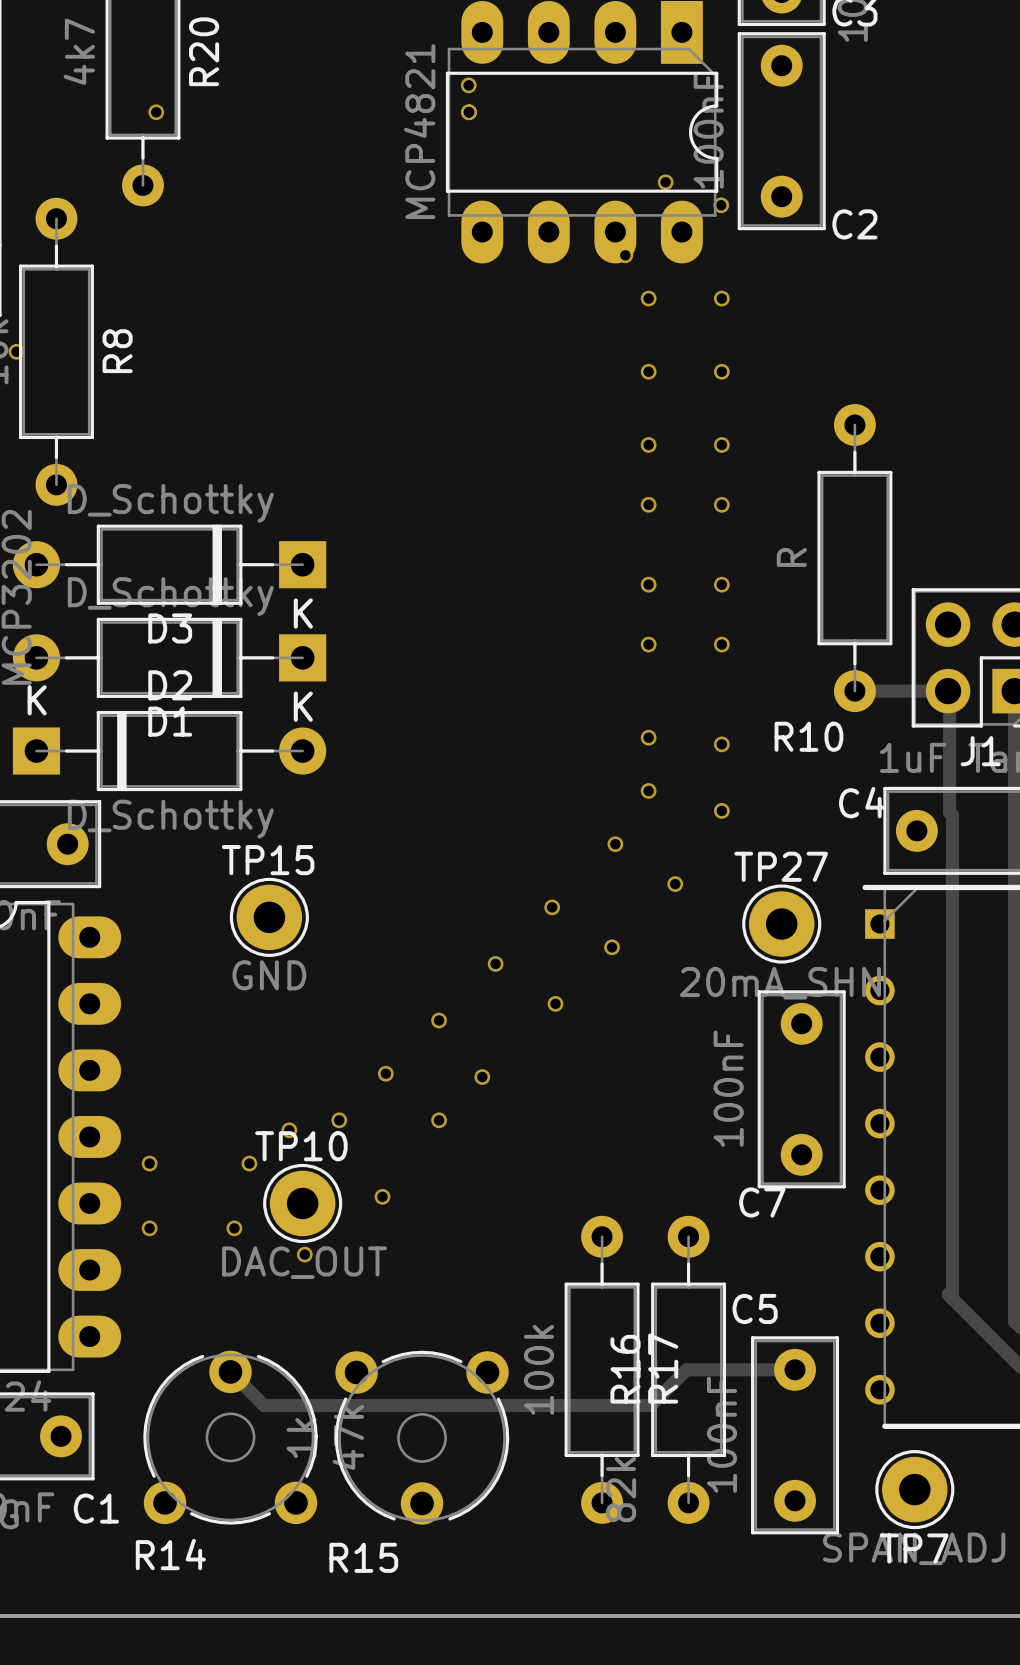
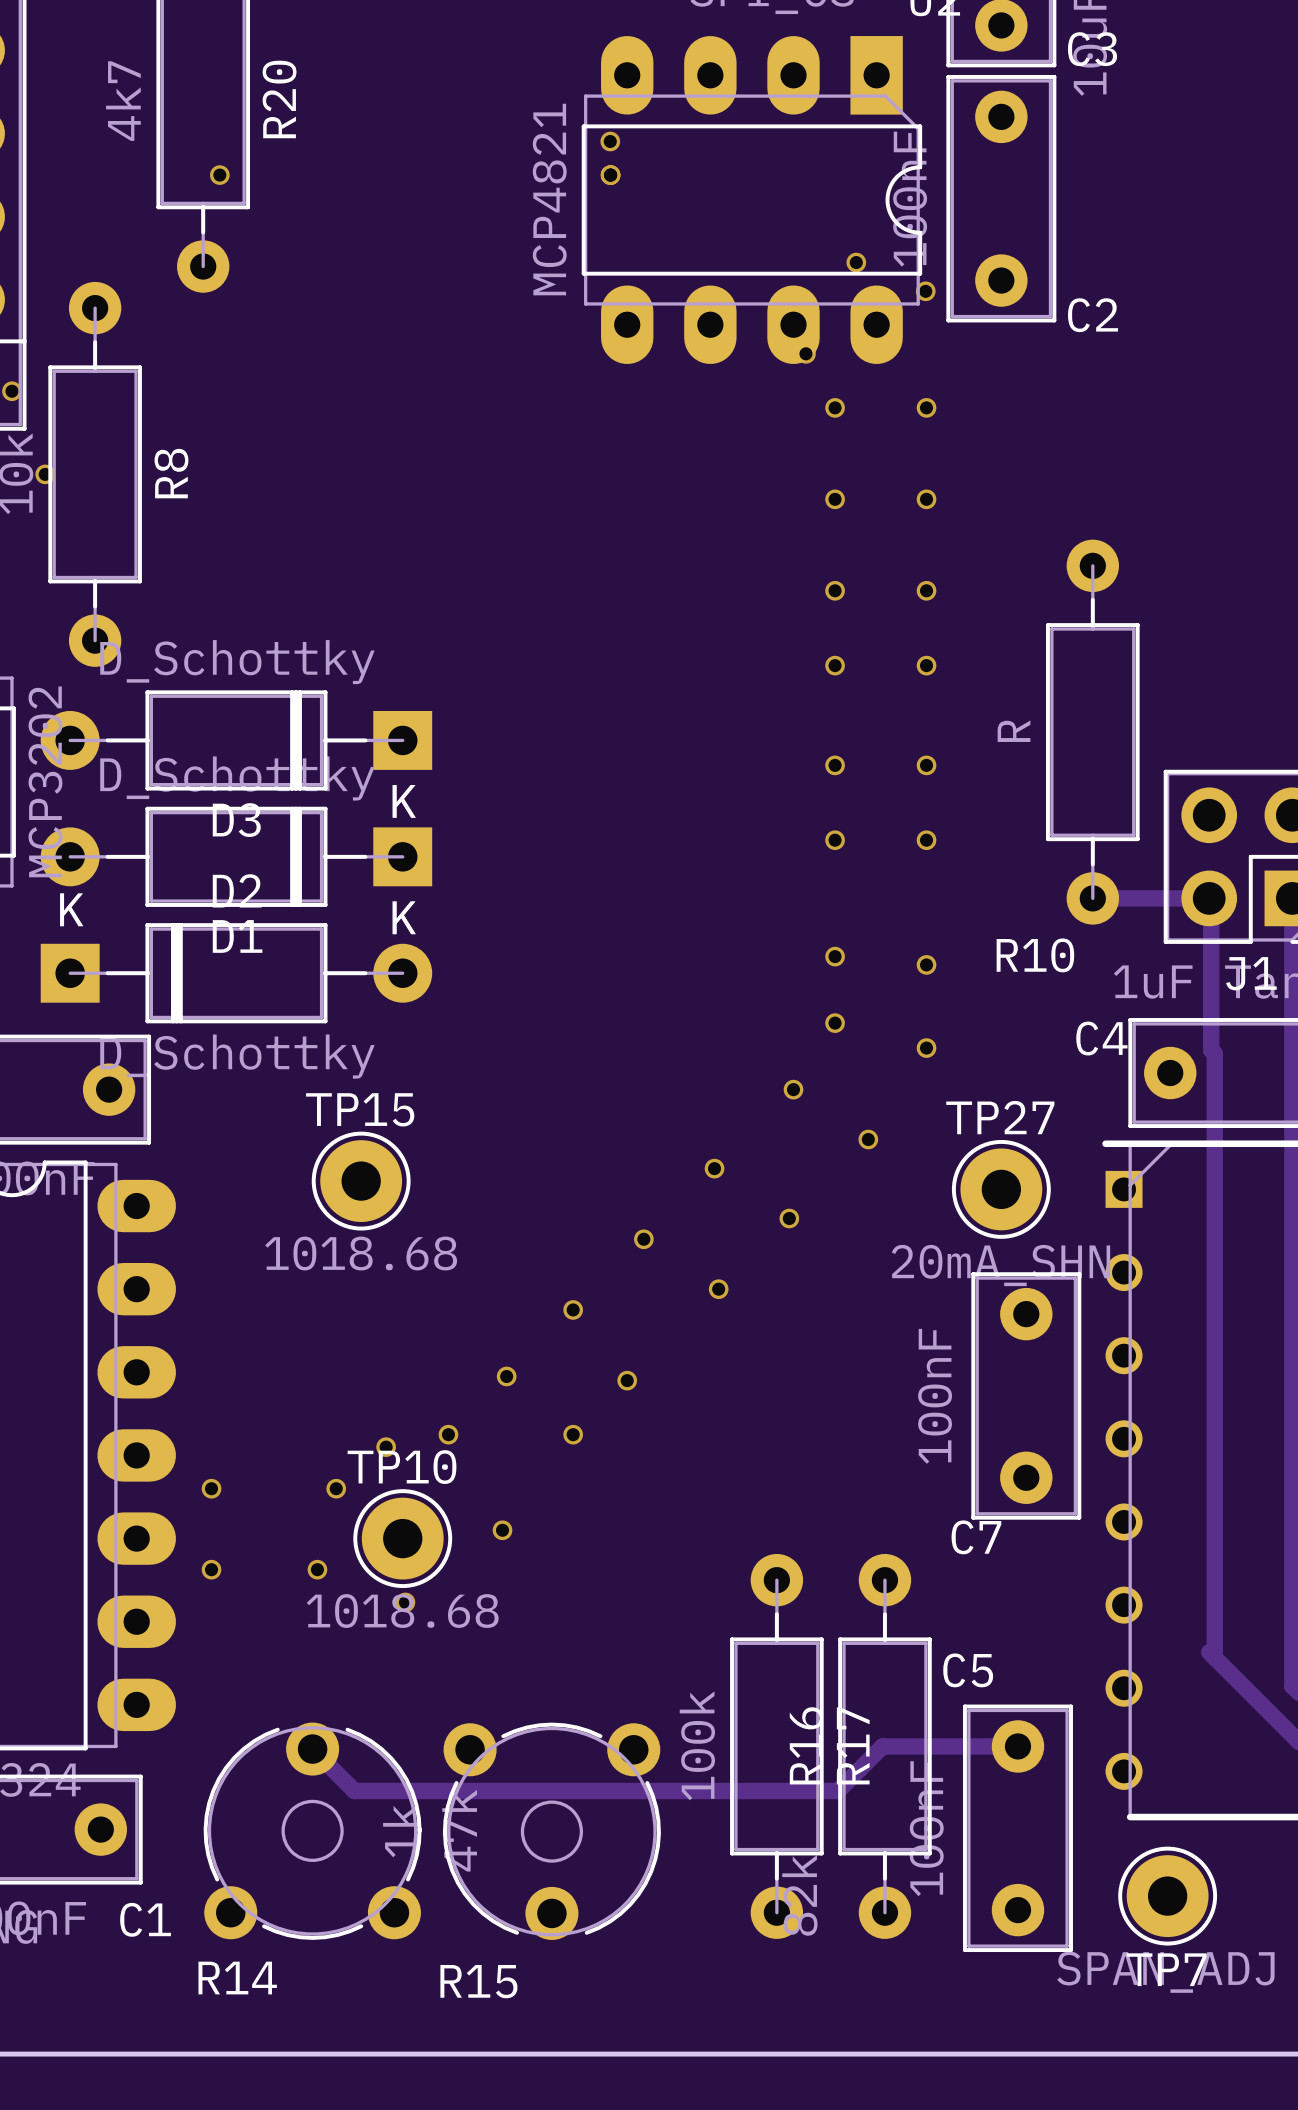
TP15 value: GND (269, 975) -> 1018.68 (361, 1253)
TP10 value: DAC_OUT (304, 1262) -> 1018.68 (402, 1611)

